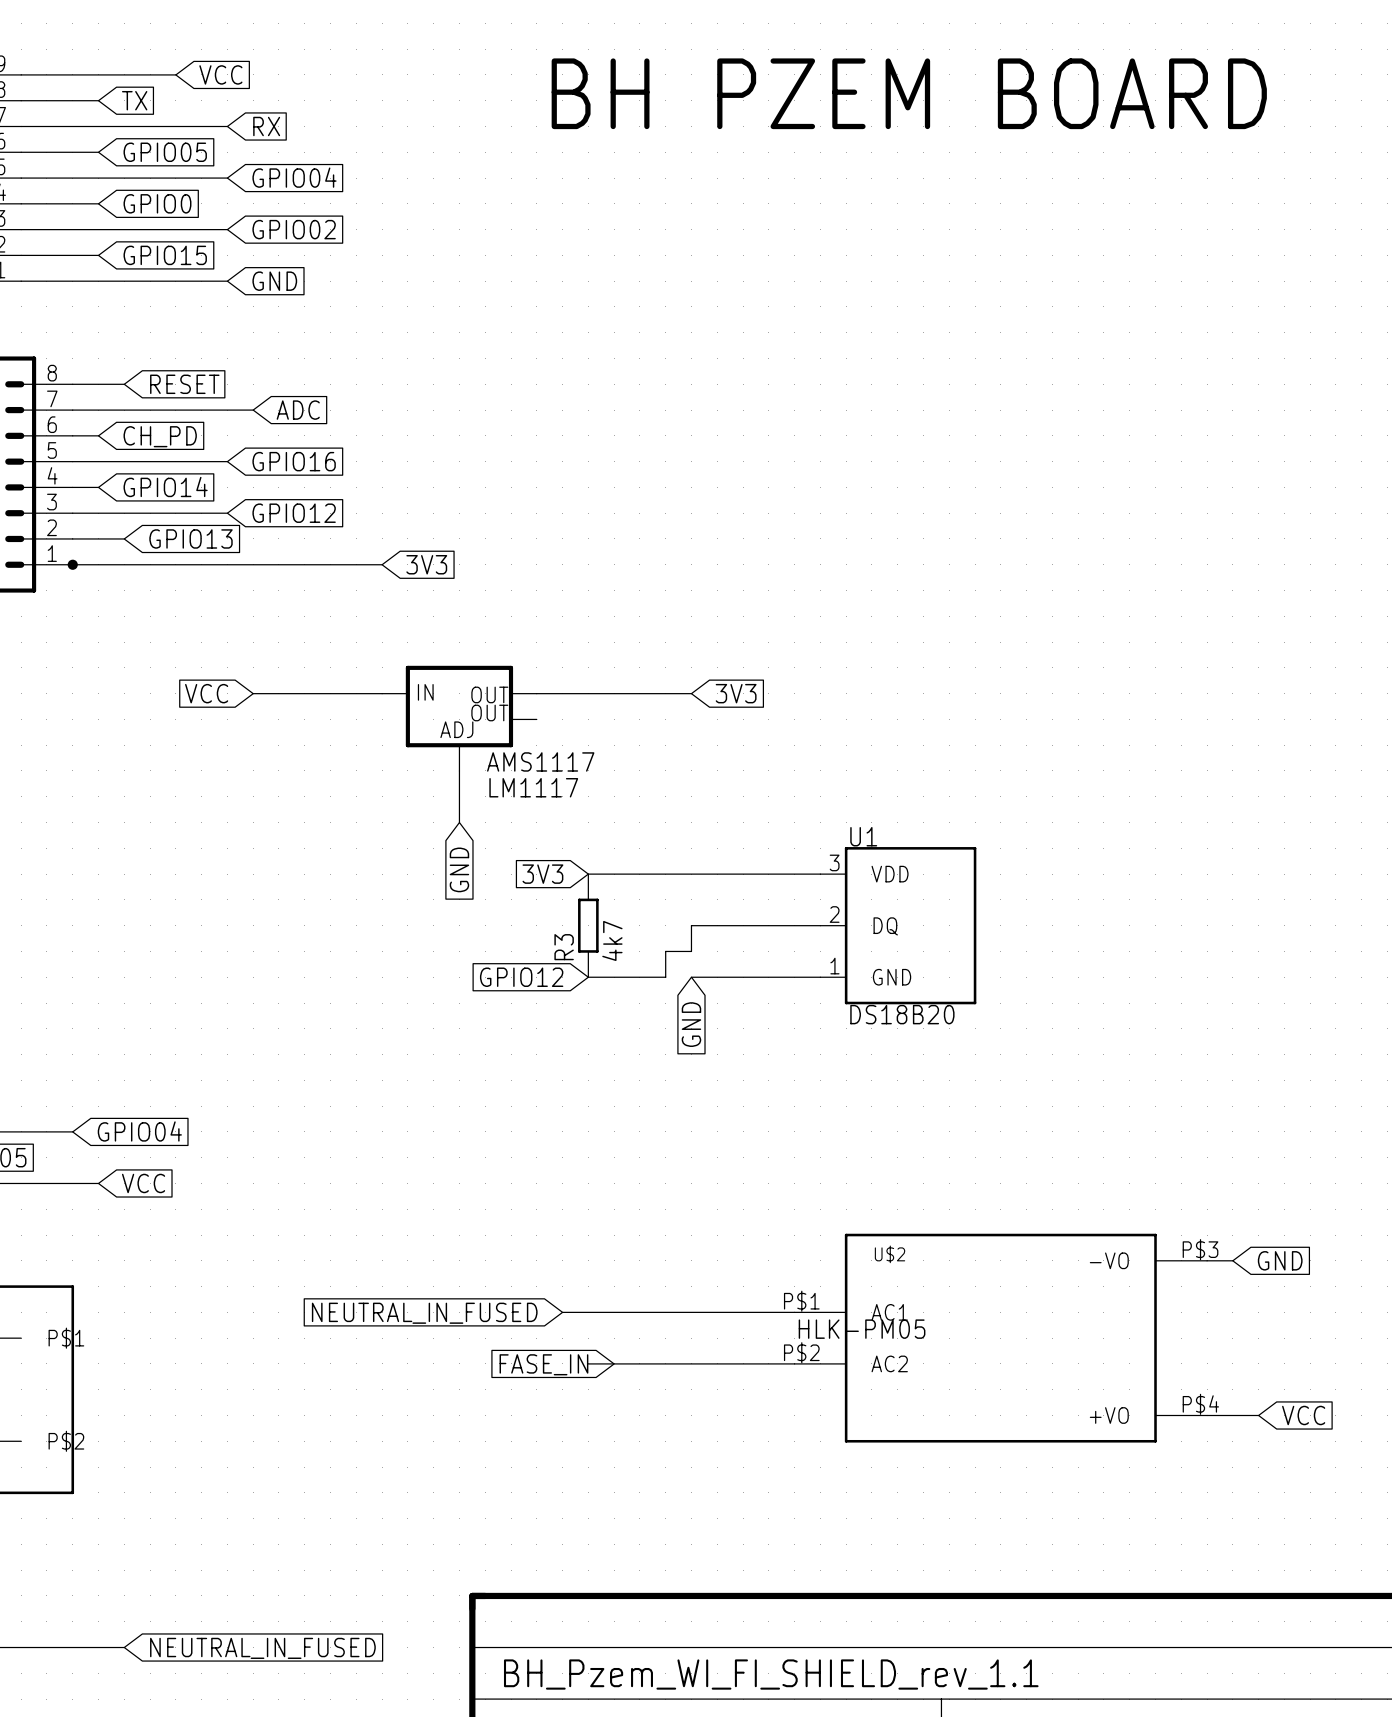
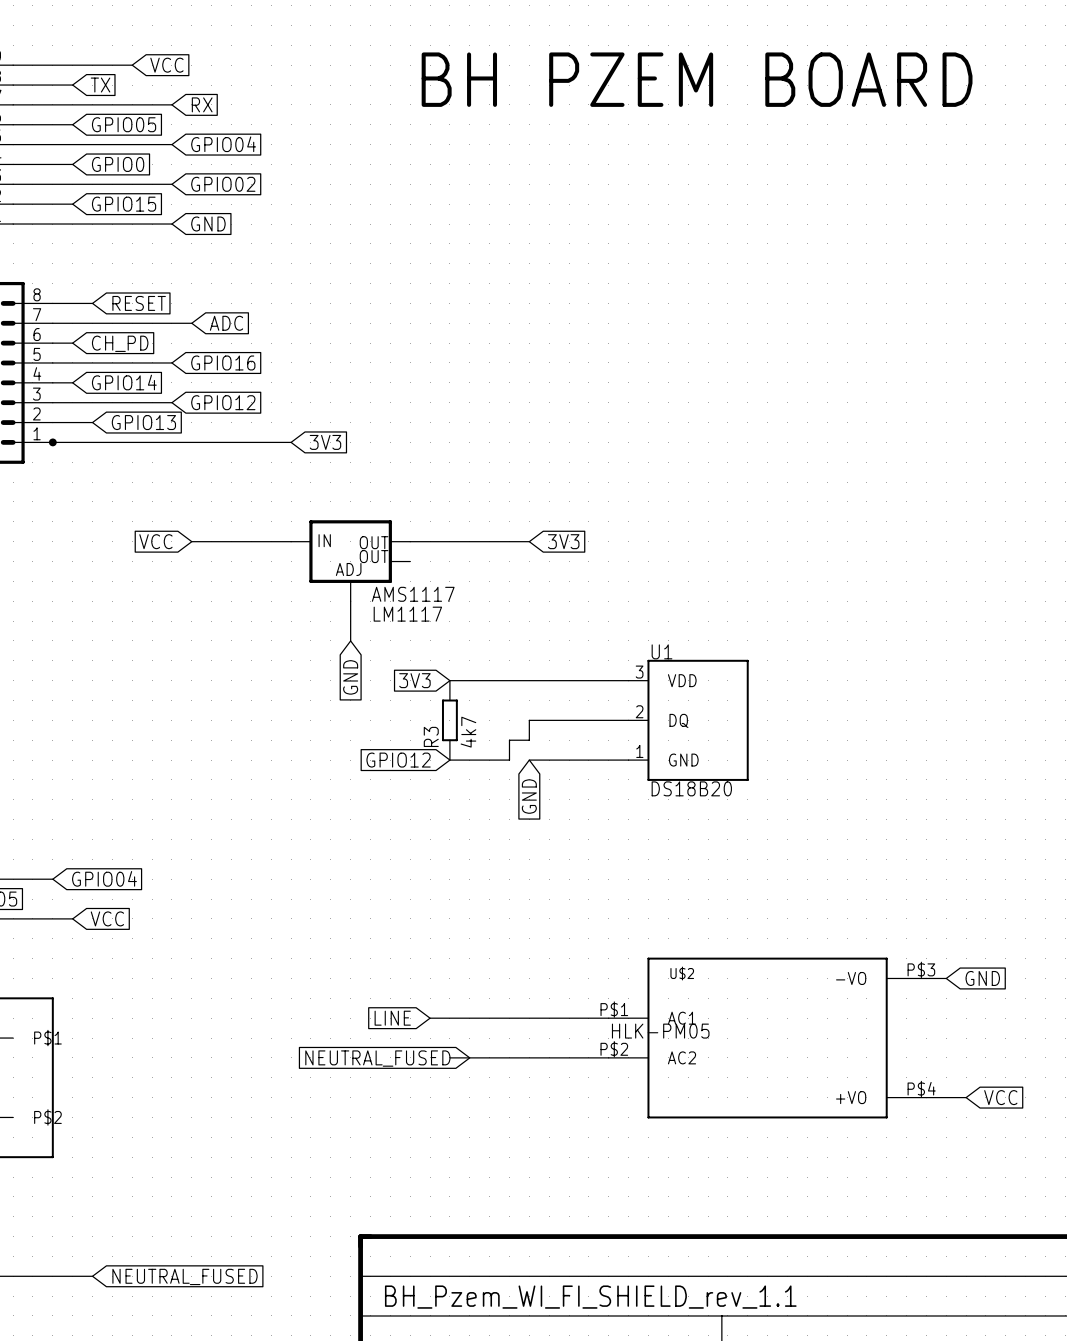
global label: NEUTRAL_IN_FUSED (424, 1313) -> LINE (392, 1018)
global label: FASE_IN (543, 1364) -> NEUTRAL_FUSED (377, 1058)
global label: NEUTRAL_IN_FUSED (262, 1648) -> NEUTRAL_FUSED (185, 1276)

